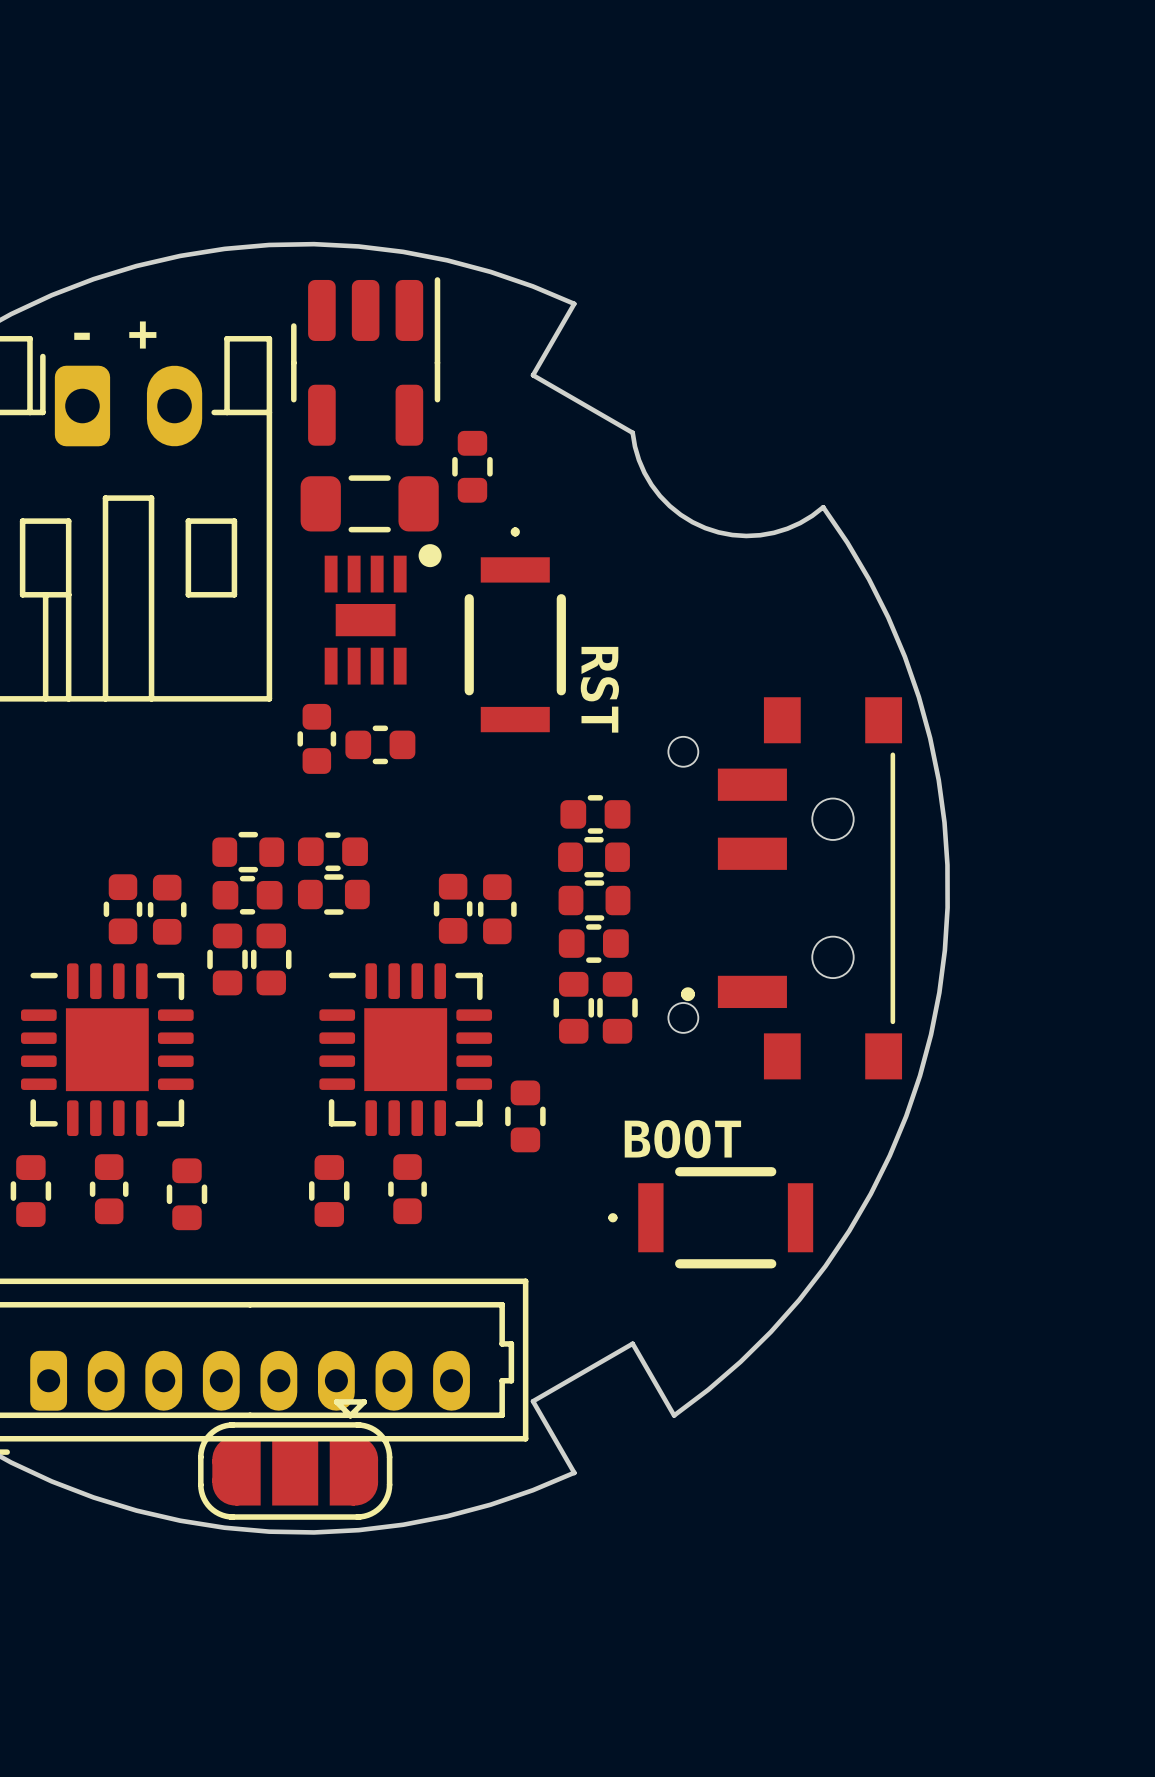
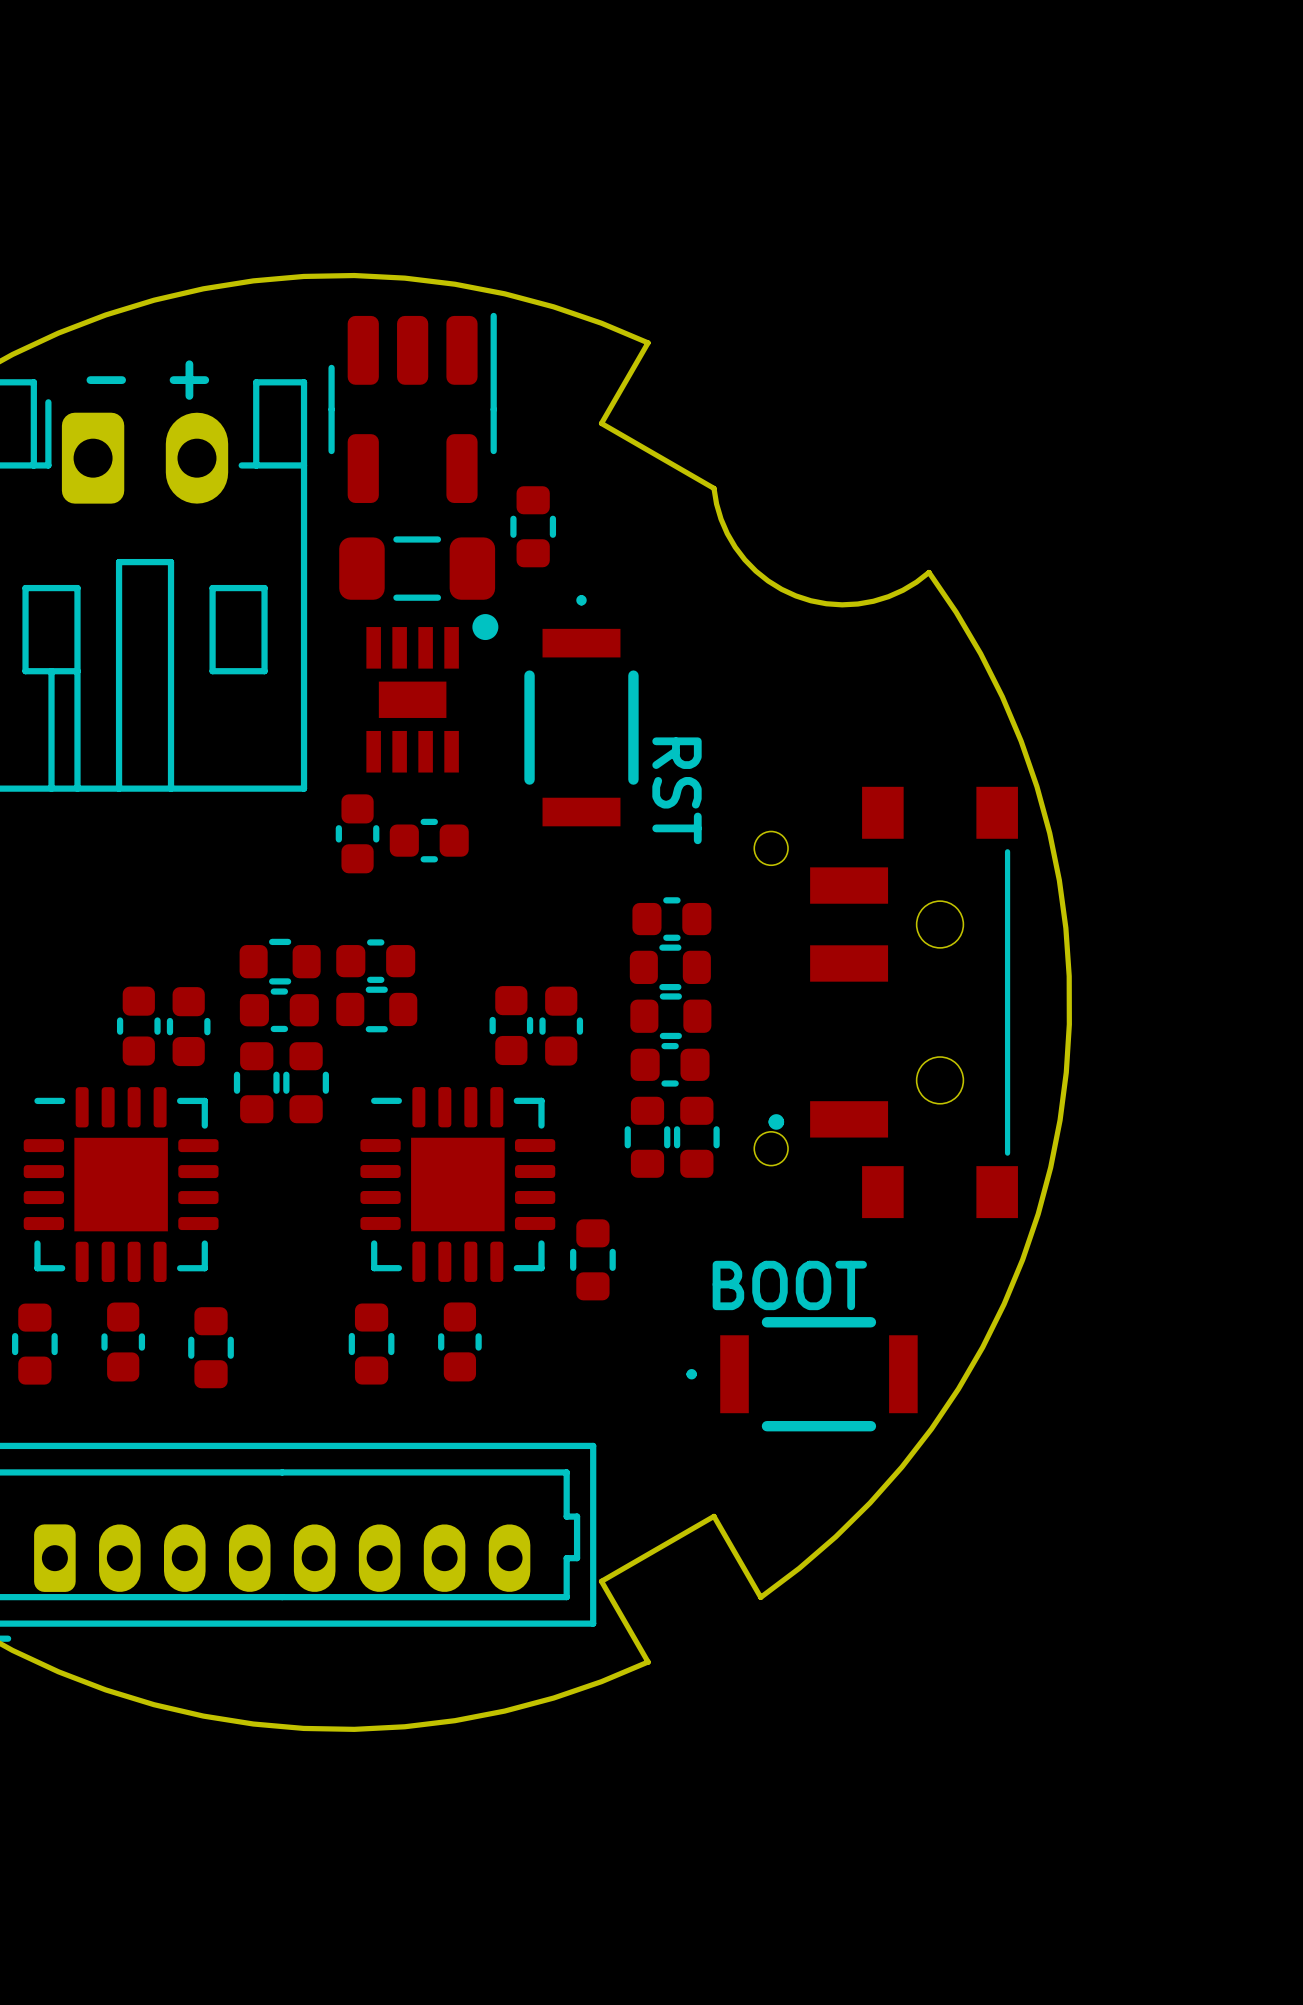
part: (295, 1459) -> none

